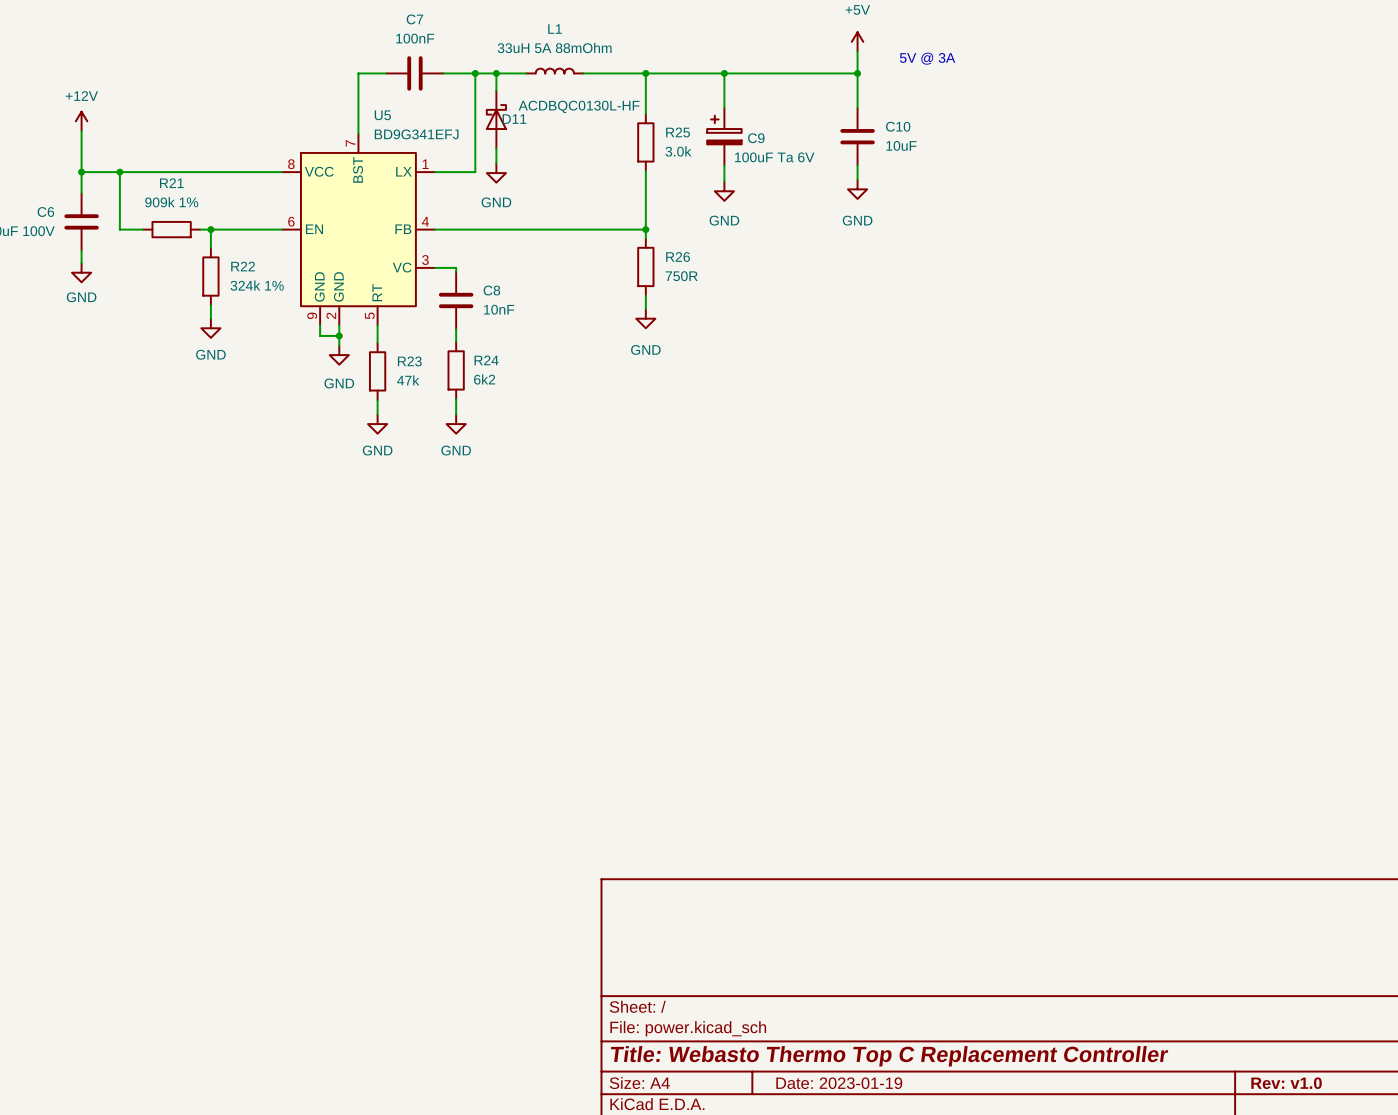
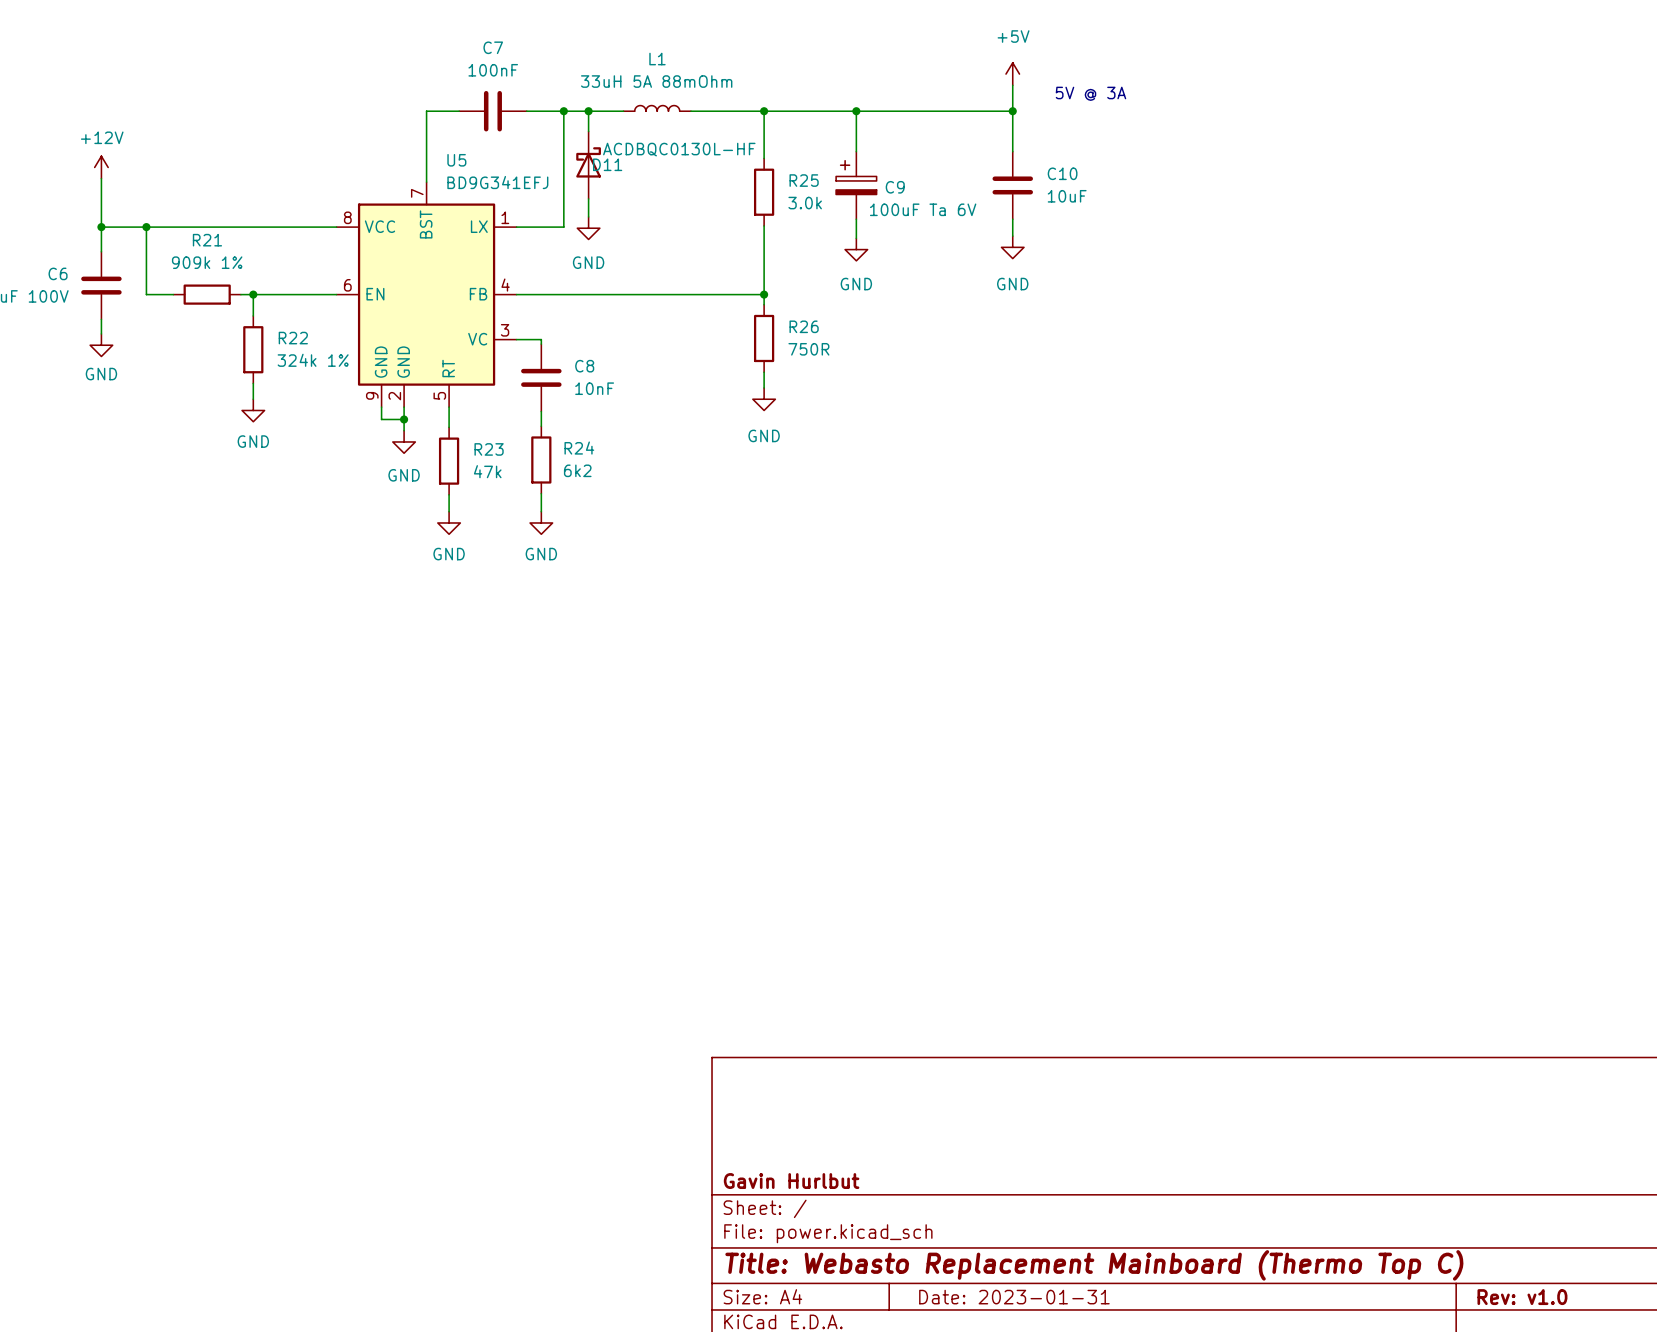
title block: none -> Gavin Hurlbut (791, 1181)
title block: Title: Webasto Thermo Top C Replacement Controller (889, 1056) -> Title: Webasto Replacement Mainboard (Thermo Top C) (1094, 1265)
title block: Date: 2023-01-19 (839, 1083) -> Date: 2023-01-31 (1014, 1297)

